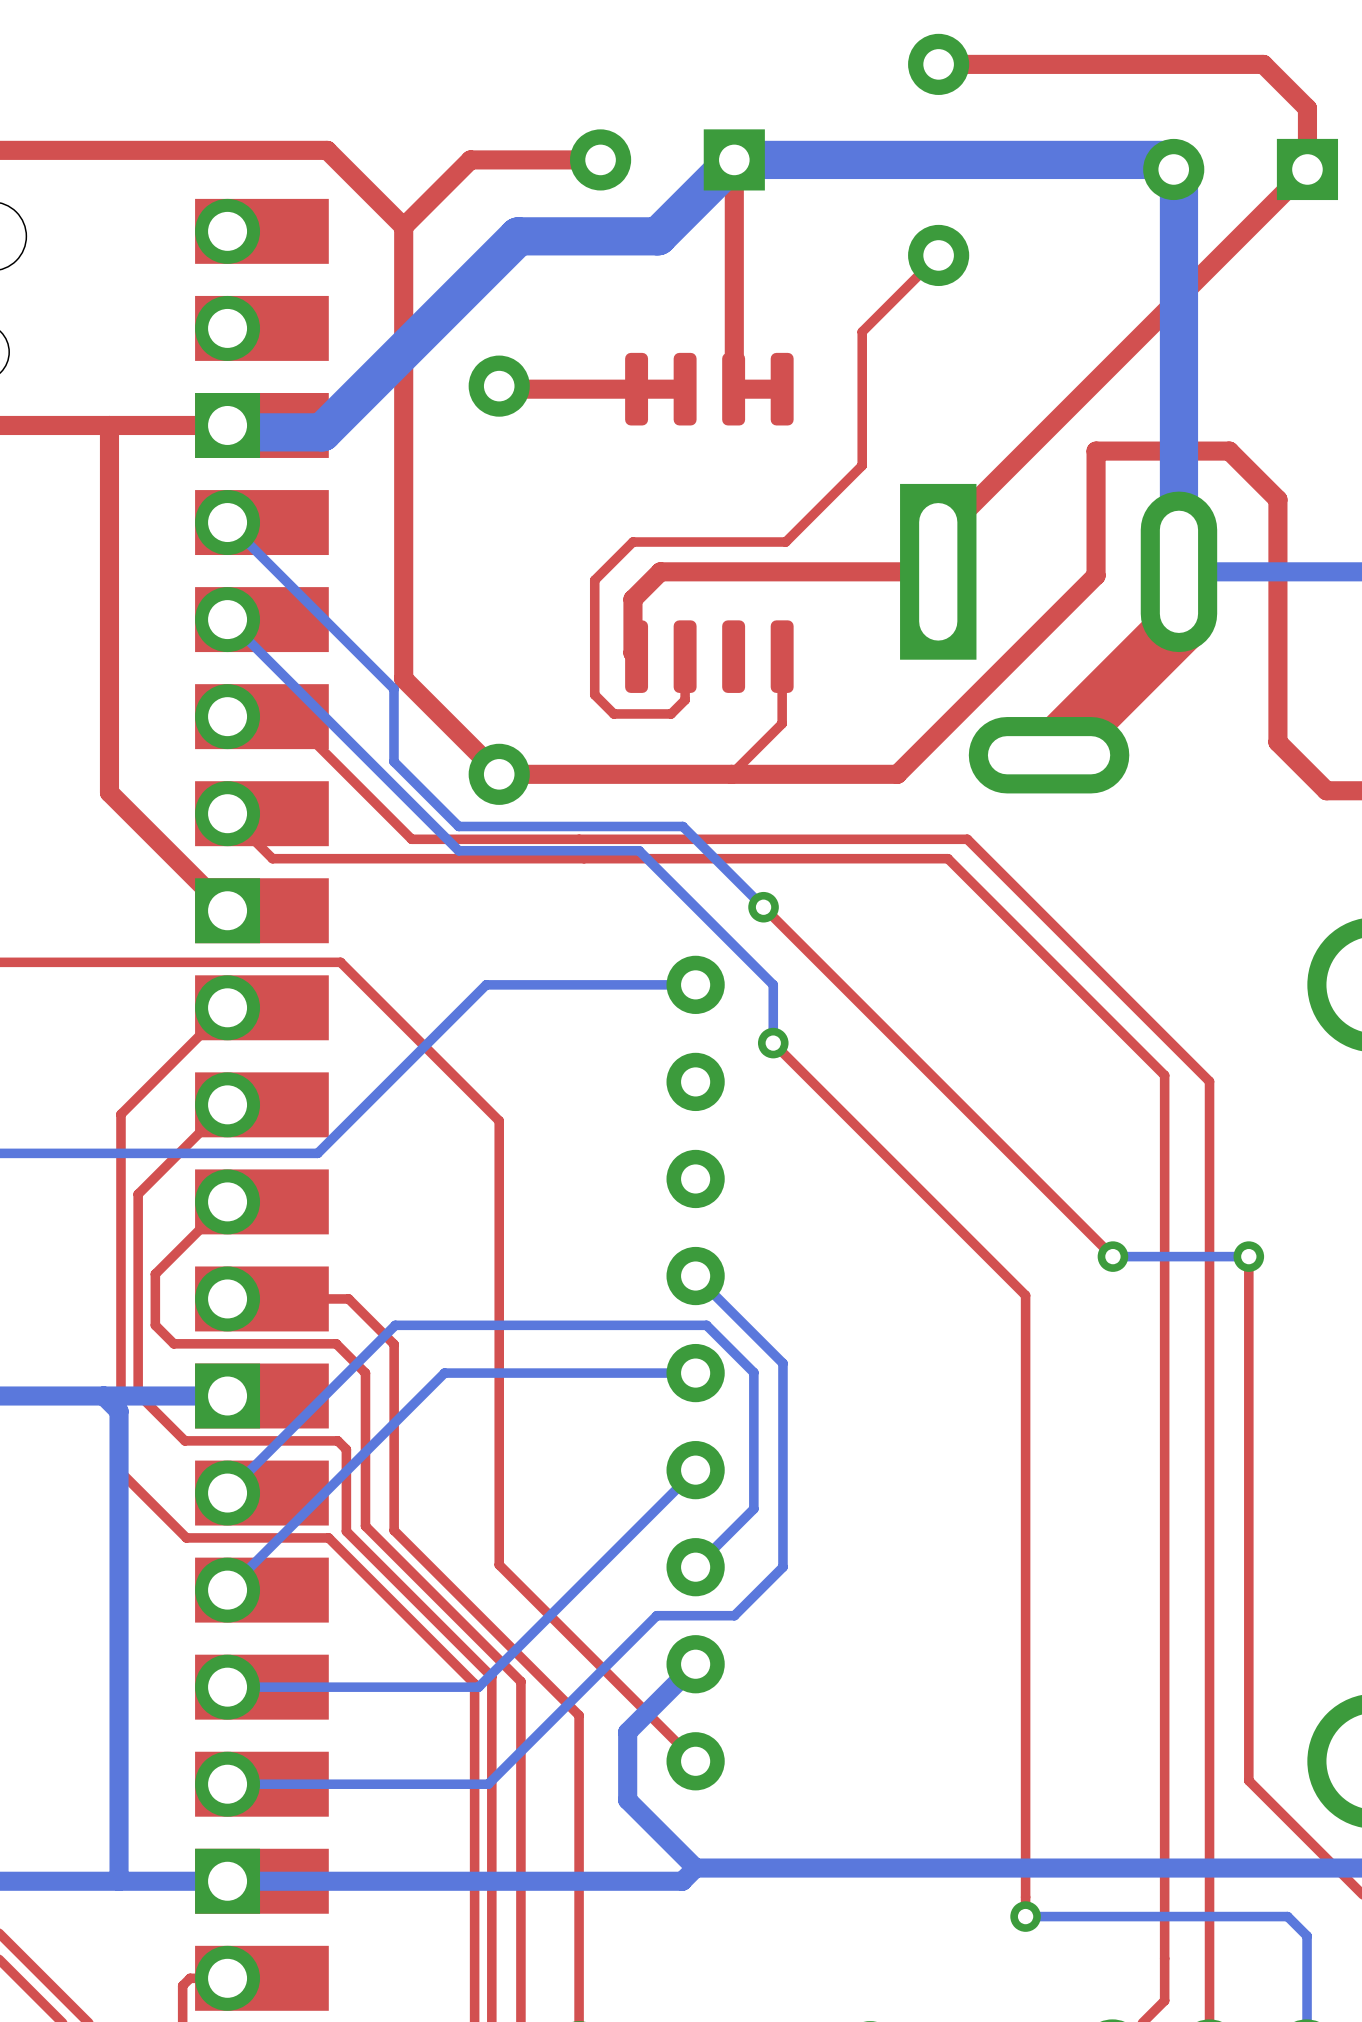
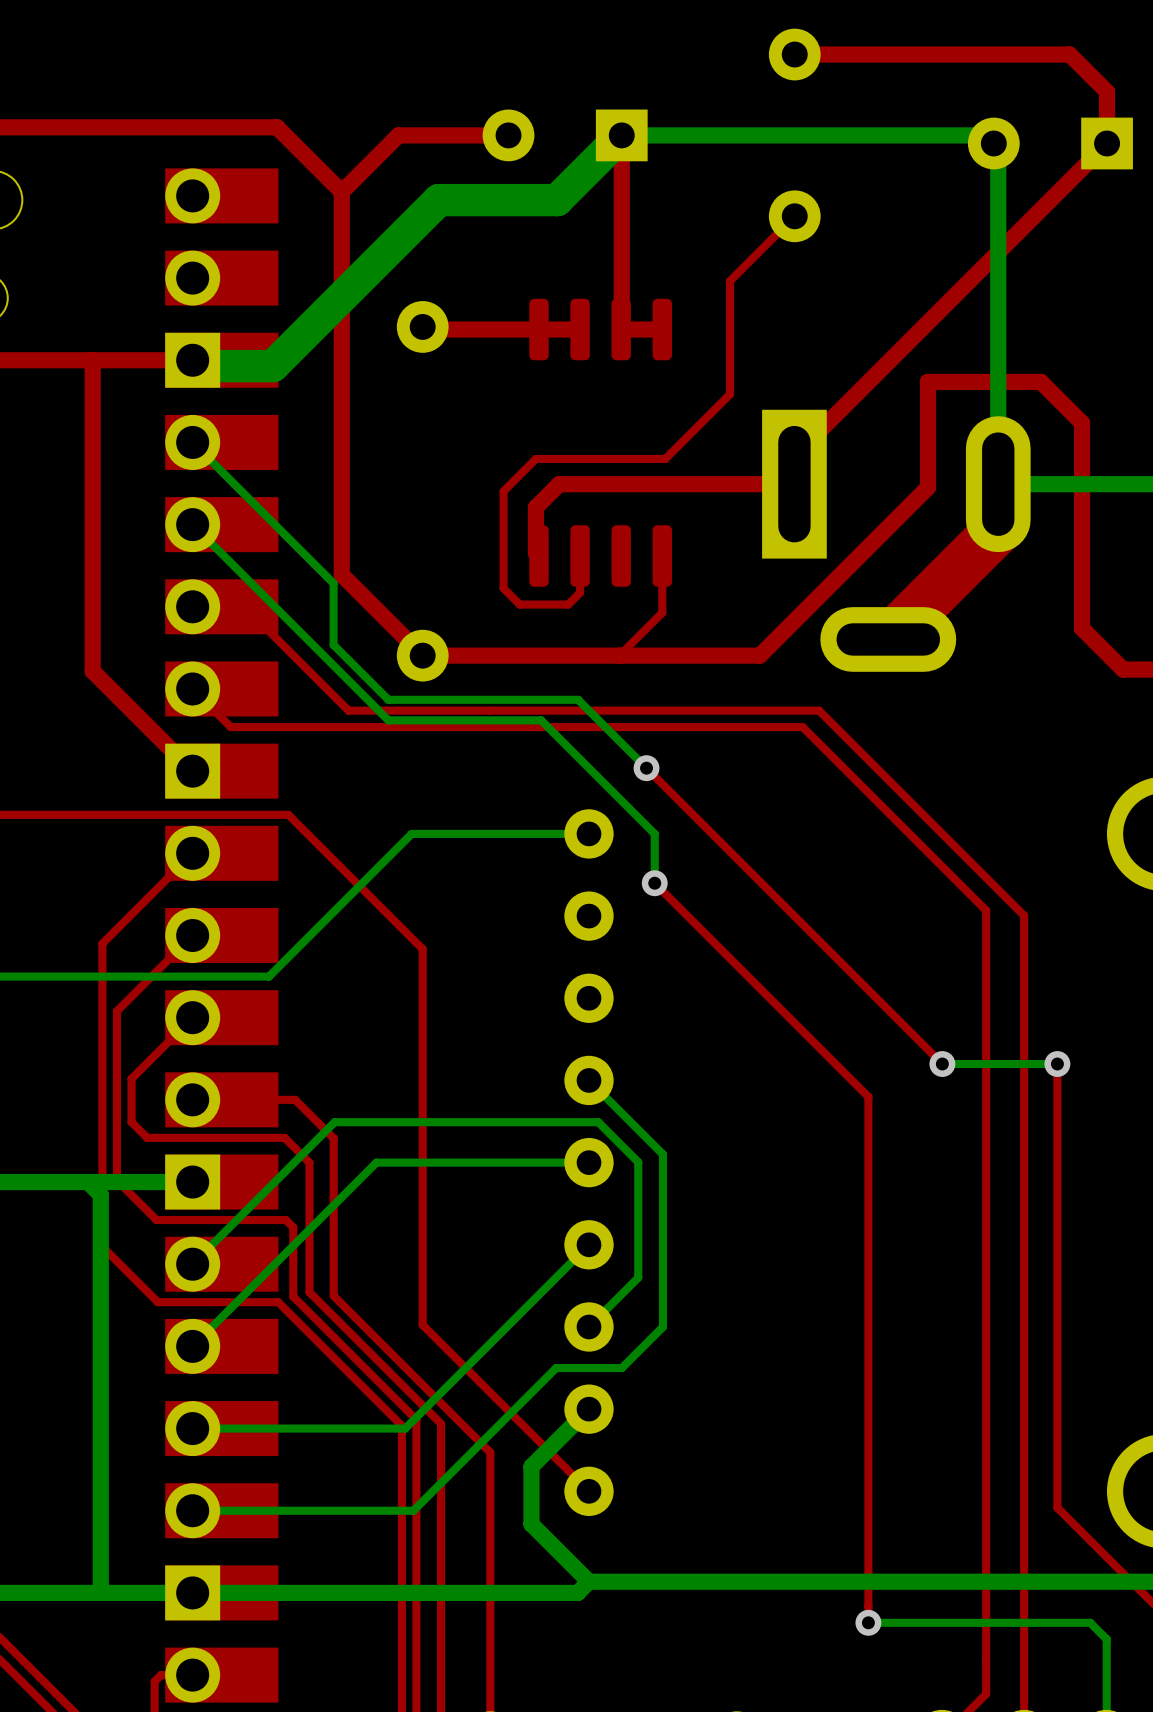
bottom track width: thick (1164, 159) (734, 159) -> thin (985, 135) (621, 135)
bottom track width: thick (1178, 174) (1178, 571) -> thin (998, 147) (998, 484)

